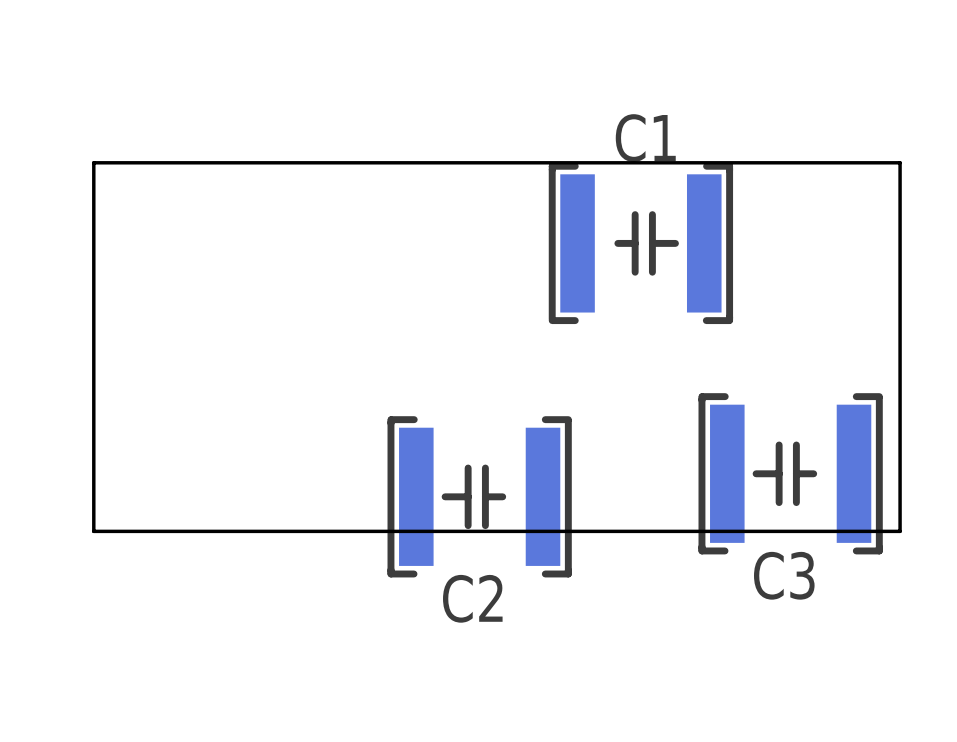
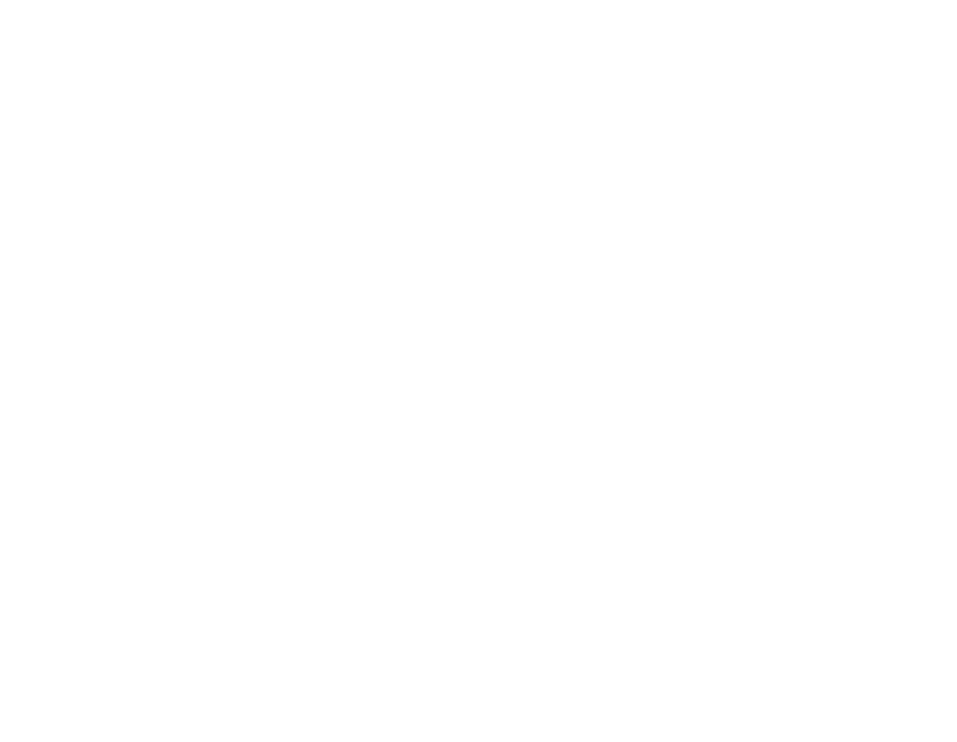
board edge: (900, 162) (900, 531) (93, 531) (93, 162) (900, 162) -> none
C1: (640, 243) -> none
C3: (790, 473) -> none
C2: (479, 496) -> none

